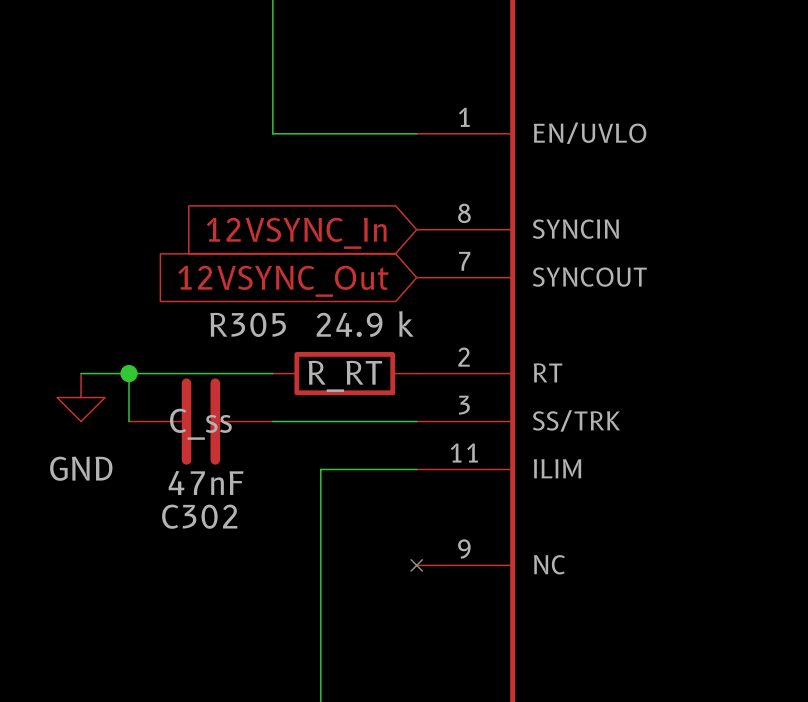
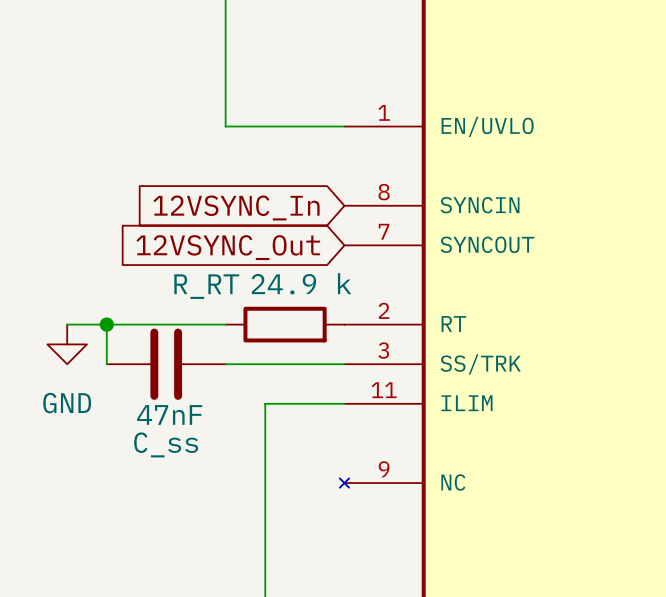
R305 name: R305 (248, 324) -> R_RT (206, 286)
R305 text: R_RT (345, 376) -> none
C302 text: C_ss (200, 424) -> none
C302 name: C302 (199, 516) -> C_ss (166, 444)

